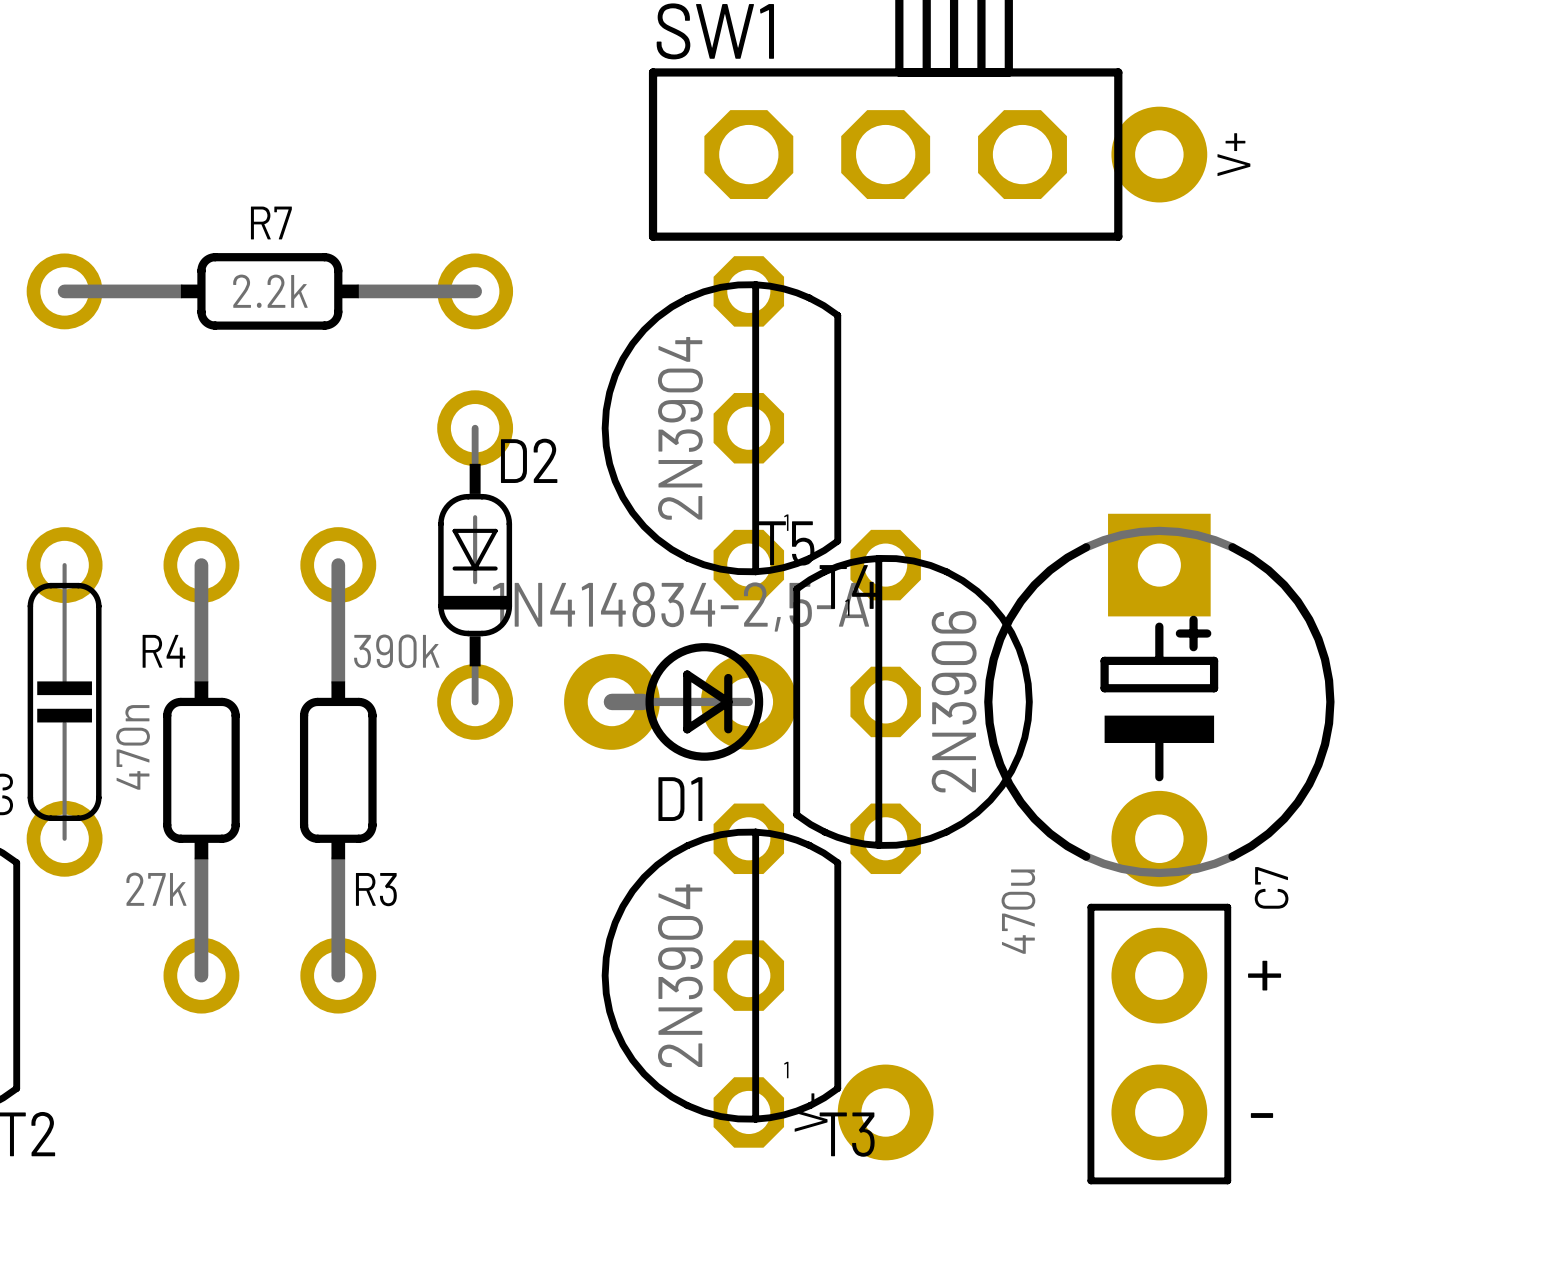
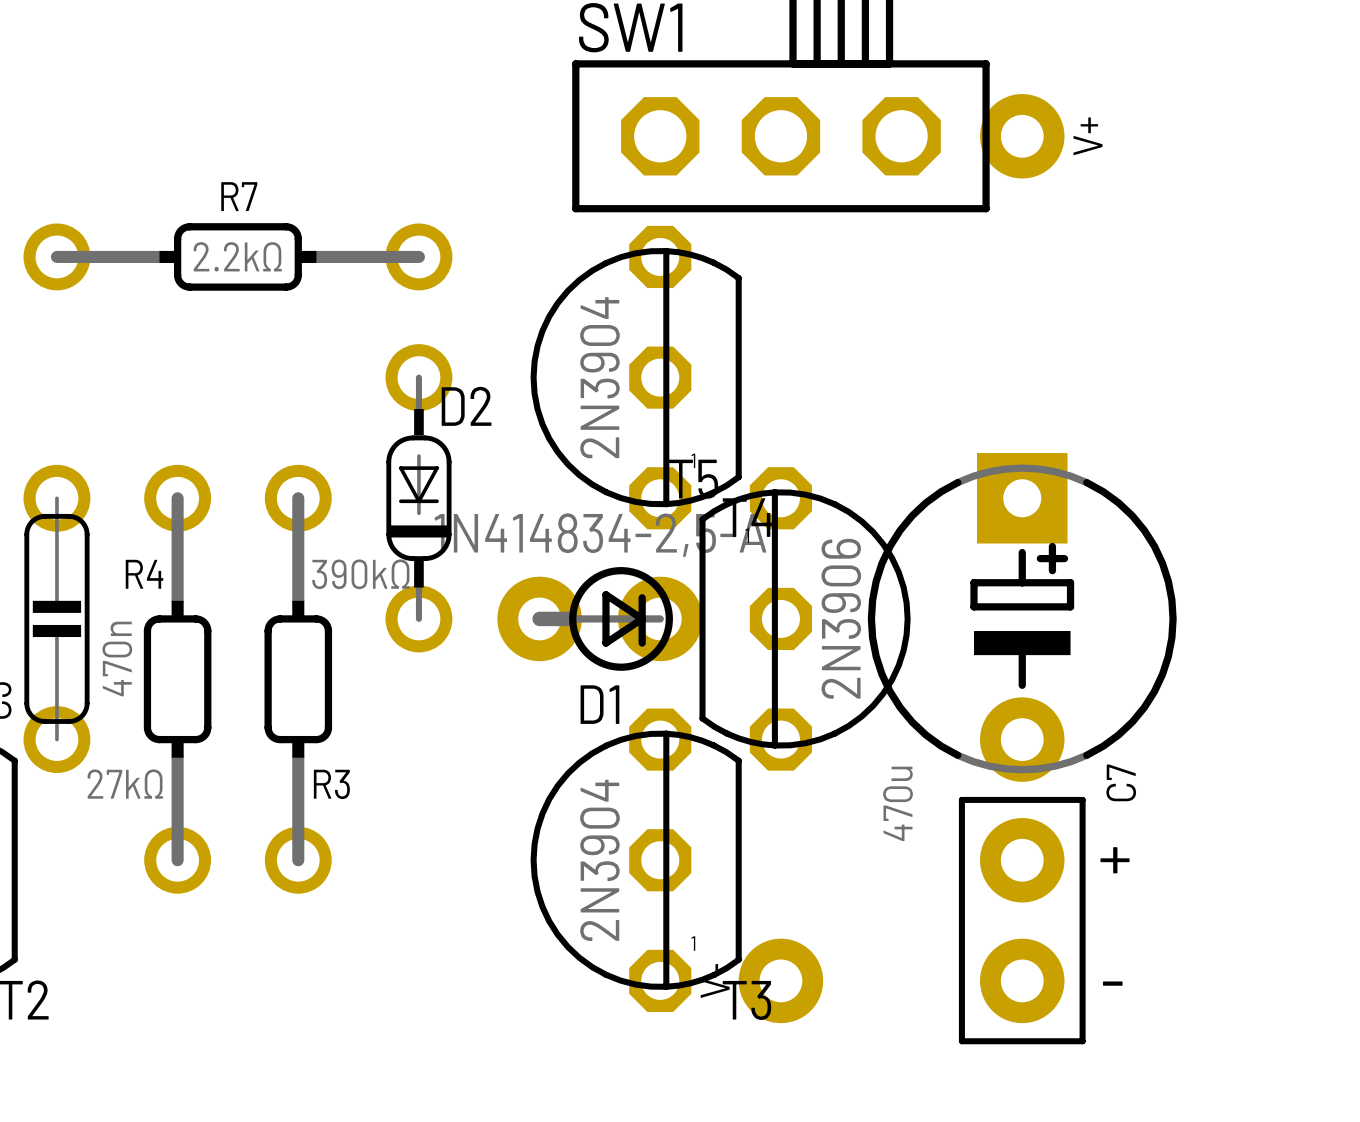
R7 value: 2.2k (270, 291) -> 2.2kΩ (237, 256)
R3 value: 390k (396, 651) -> 390kΩ (361, 574)
R4 value: 27k (156, 889) -> 27kΩ (125, 784)

